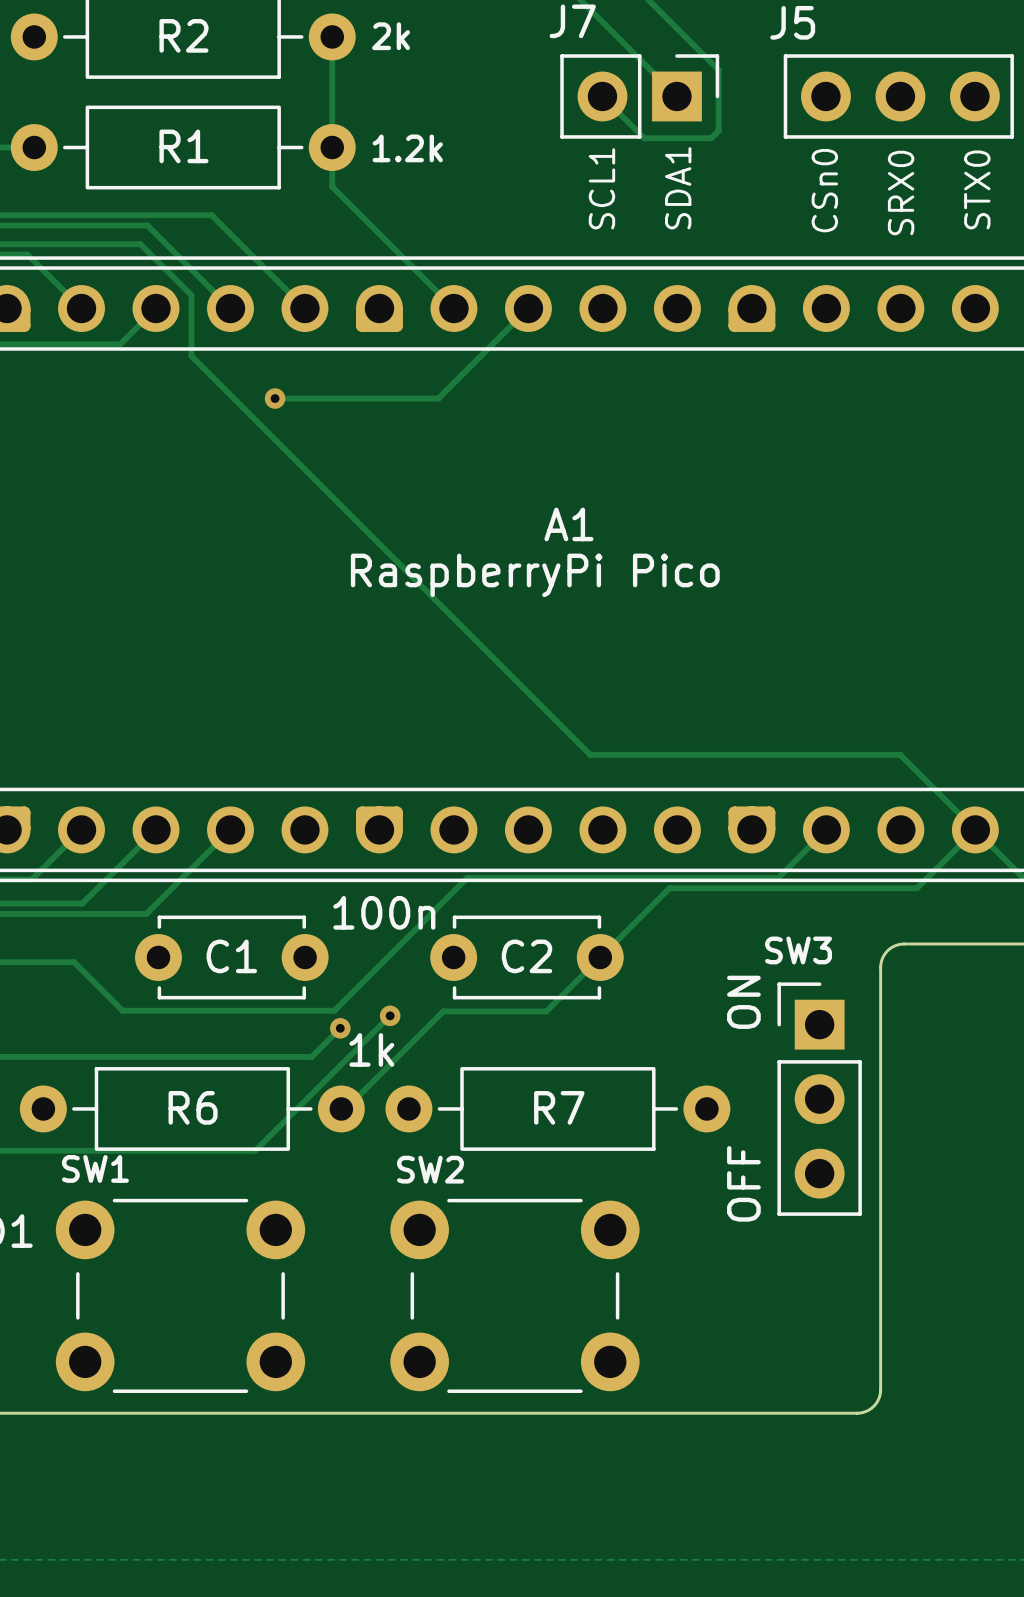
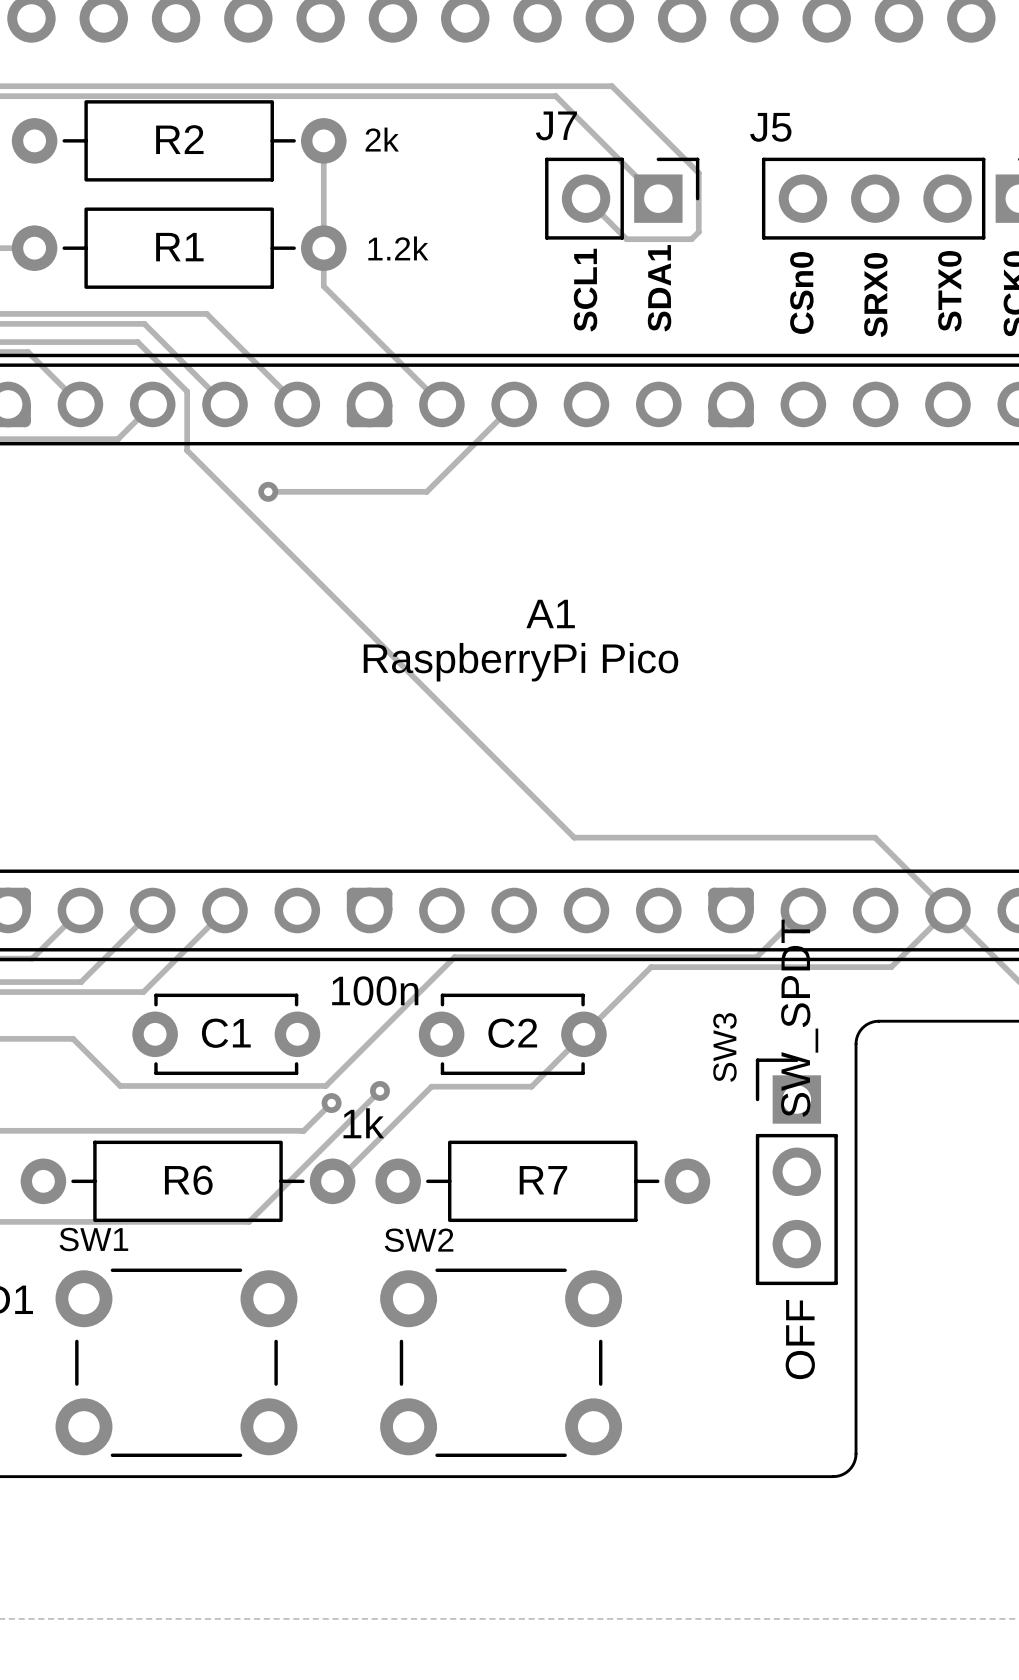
SW3 name rotation: 0° (798, 950) -> 90° counterclockwise (724, 1047)
SW3 value: OFF ON (743, 1098) -> SW_SPDT (799, 1018)
text: none -> OFF (800, 1339)

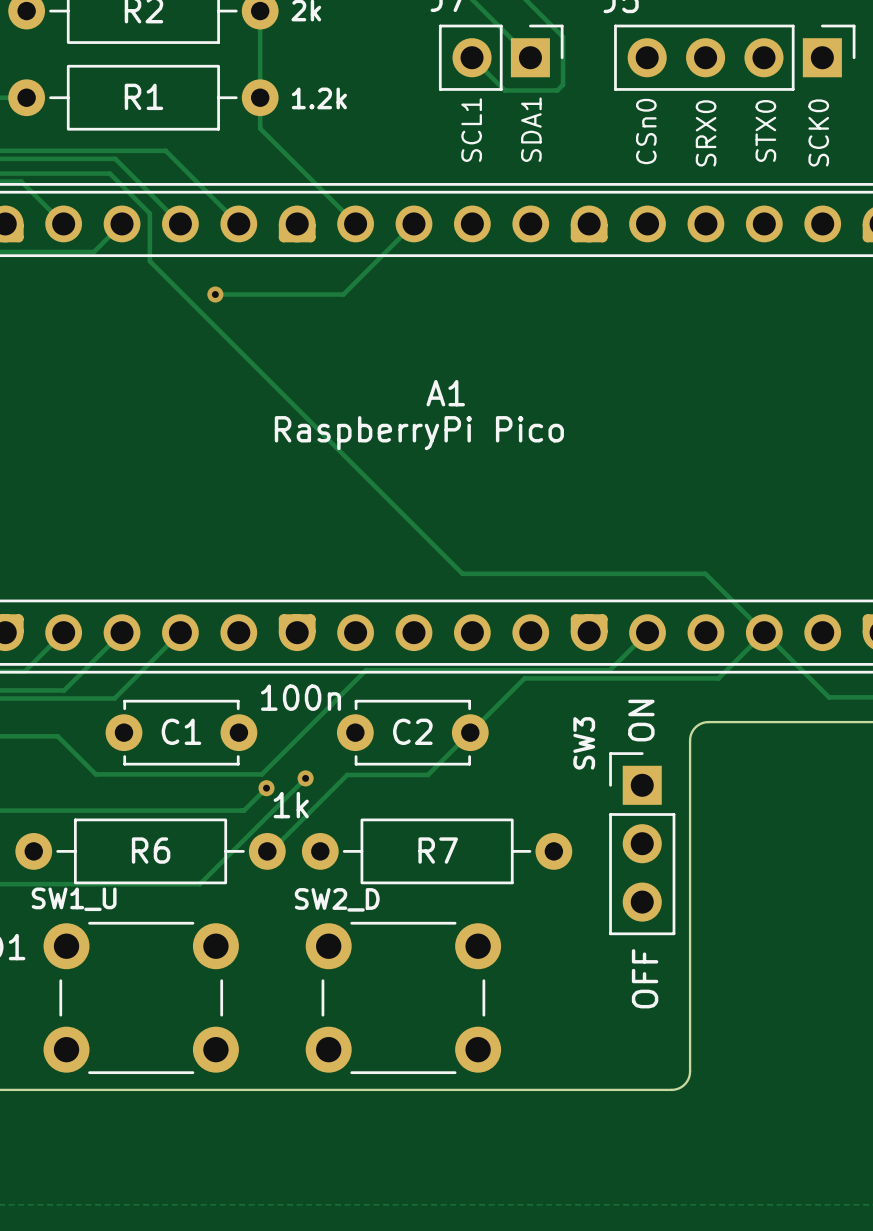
SW3 value: SW_SPDT (799, 1018) -> ON (641, 720)
SW1 name: SW1 (93, 1239) -> SW1_U (74, 899)
SW2 name: SW2 (419, 1240) -> SW2_D (337, 899)

